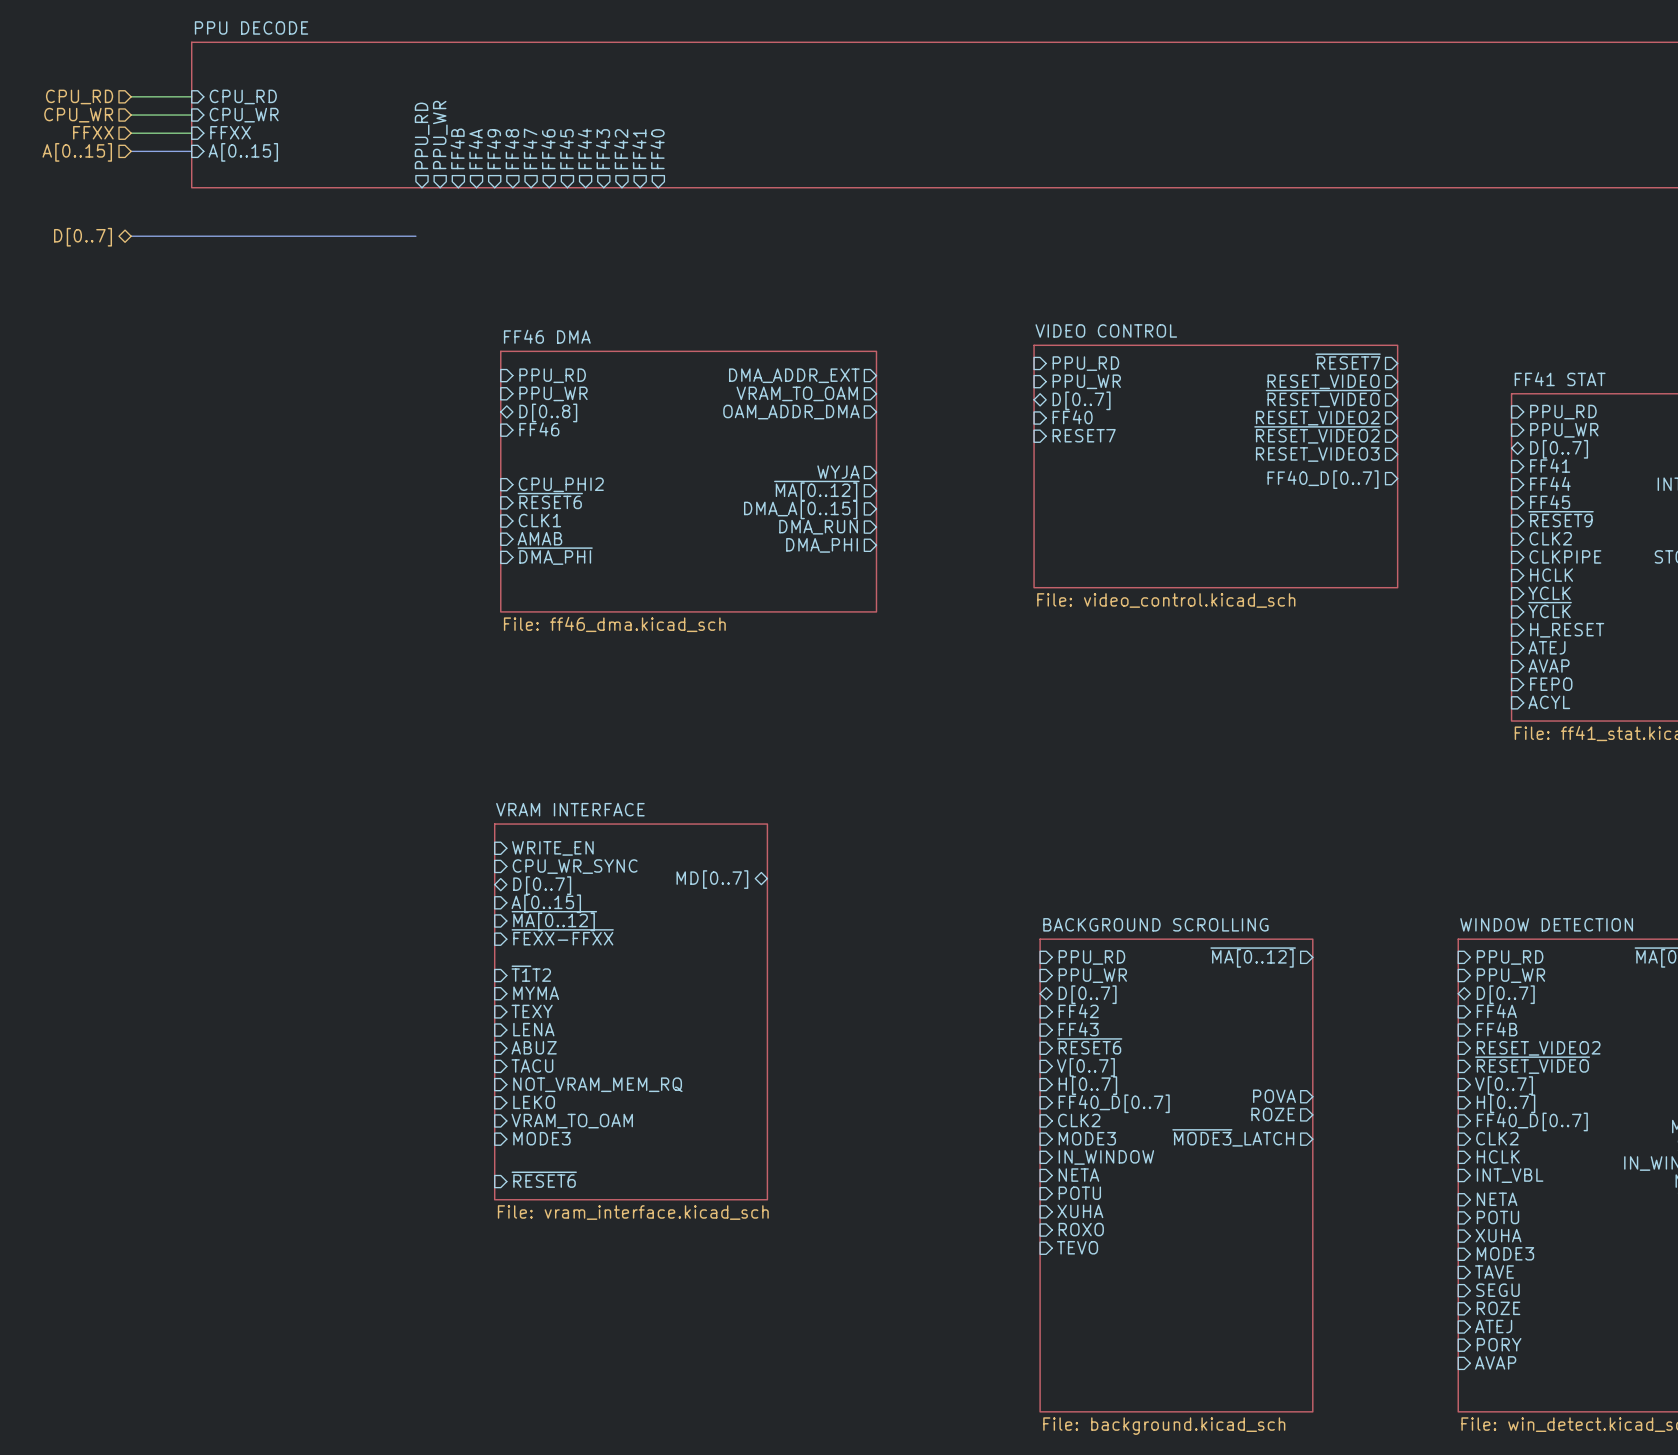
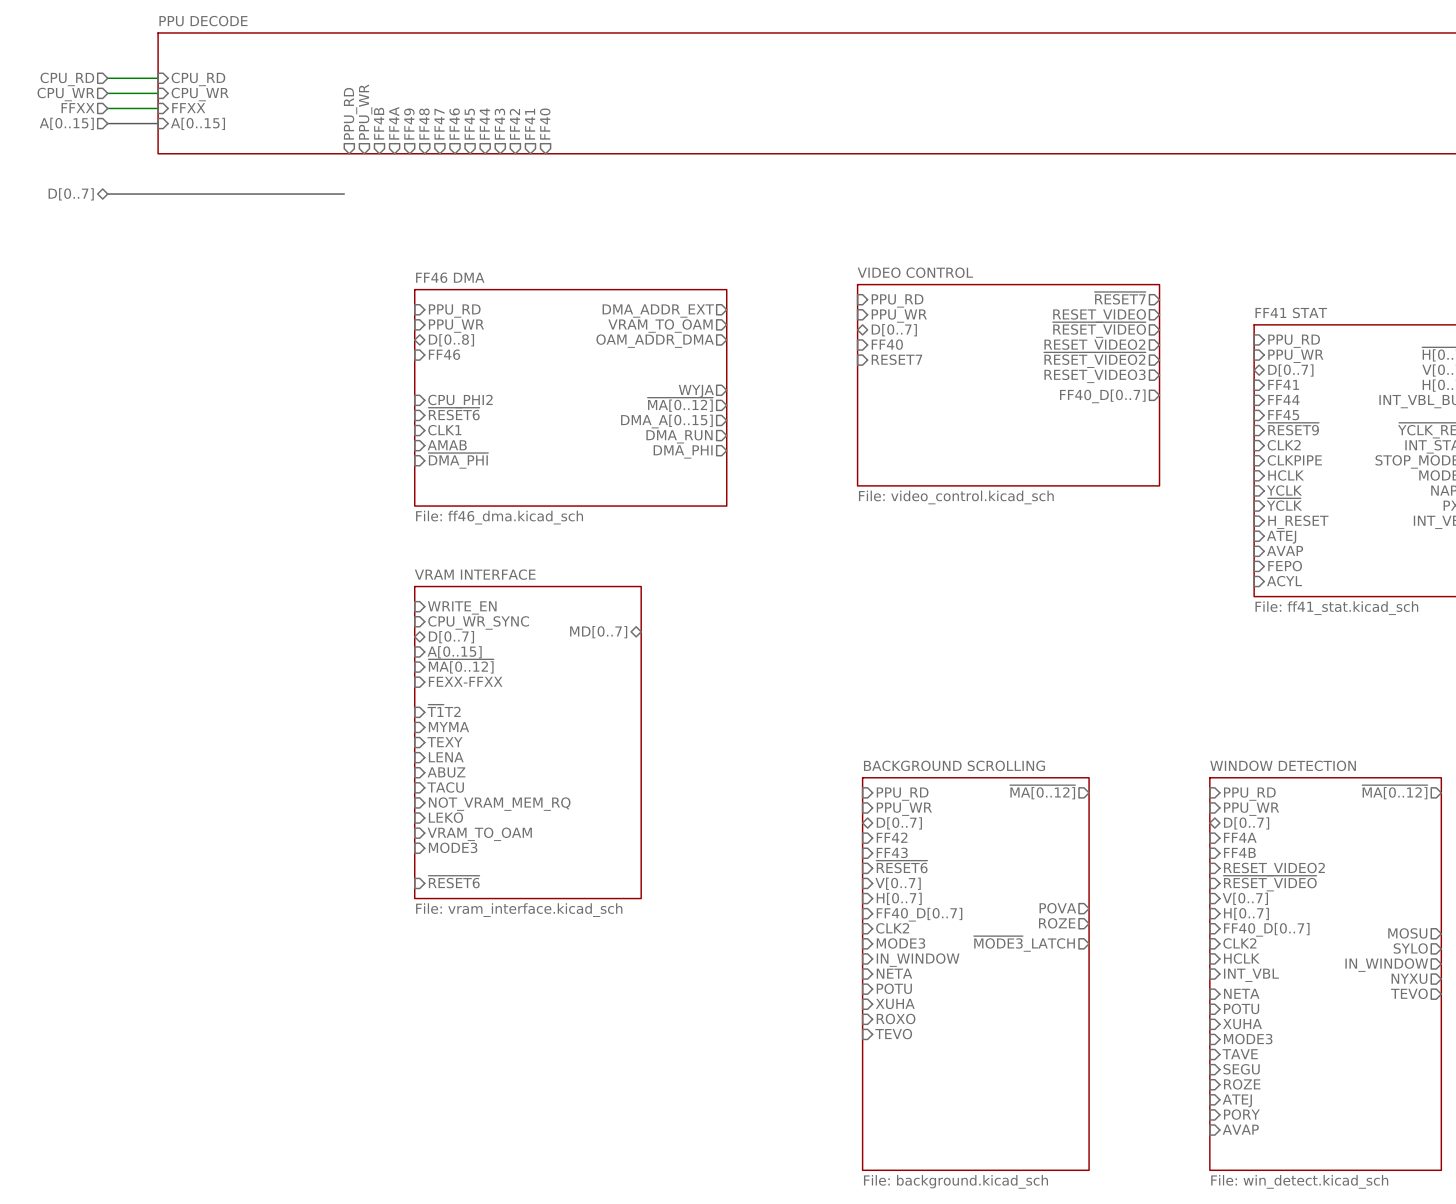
sheet pin: none -> FEXX-FFXX (465, 681)
sheet pin position: WRITE_EN (552, 848) -> WRITE_EN (462, 607)
sheet pin position: CPU_WR_SYNC (575, 866) -> CPU_WR_SYNC (478, 622)
sheet pin position: MD[0..7] (712, 879) -> MD[0..7] (598, 632)
sheet pin position: D[0..7] (542, 885) -> D[0..7] (451, 637)
sheet pin position: A[0..15] (546, 903) -> A[0..15] (454, 652)
sheet pin position: ~{MA[0..12]} (554, 921) -> ~{MA[0..12]} (461, 666)
sheet pin: ~{FEXX-FFXX} (562, 937) -> none
sheet pin position: ~{T1}T2 (531, 973) -> ~{T1}T2 (444, 710)
sheet pin position: MYMA (536, 993) -> MYMA (448, 727)
sheet pin position: TEXY (532, 1011) -> TEXY (445, 742)
sheet VRAM INTERFACE position: (631, 1011) -> (527, 742)
sheet pin position: LENA (533, 1029) -> LENA (446, 757)
sheet pin position: ABUZ (534, 1047) -> ABUZ (446, 772)
sheet pin position: TACU (532, 1065) -> TACU (445, 787)
sheet pin position: NOT_VRAM_MEM_RQ (597, 1084) -> NOT_VRAM_MEM_RQ (499, 804)
sheet pin position: LEKO (534, 1102) -> LEKO (445, 817)
sheet pin position: VRAM_TO_OAM (572, 1121) -> VRAM_TO_OAM (479, 834)
sheet pin position: MODE3 (541, 1138) -> MODE3 (453, 847)
sheet pin position: ~{RESET6} (544, 1179) -> ~{RESET6} (454, 882)

